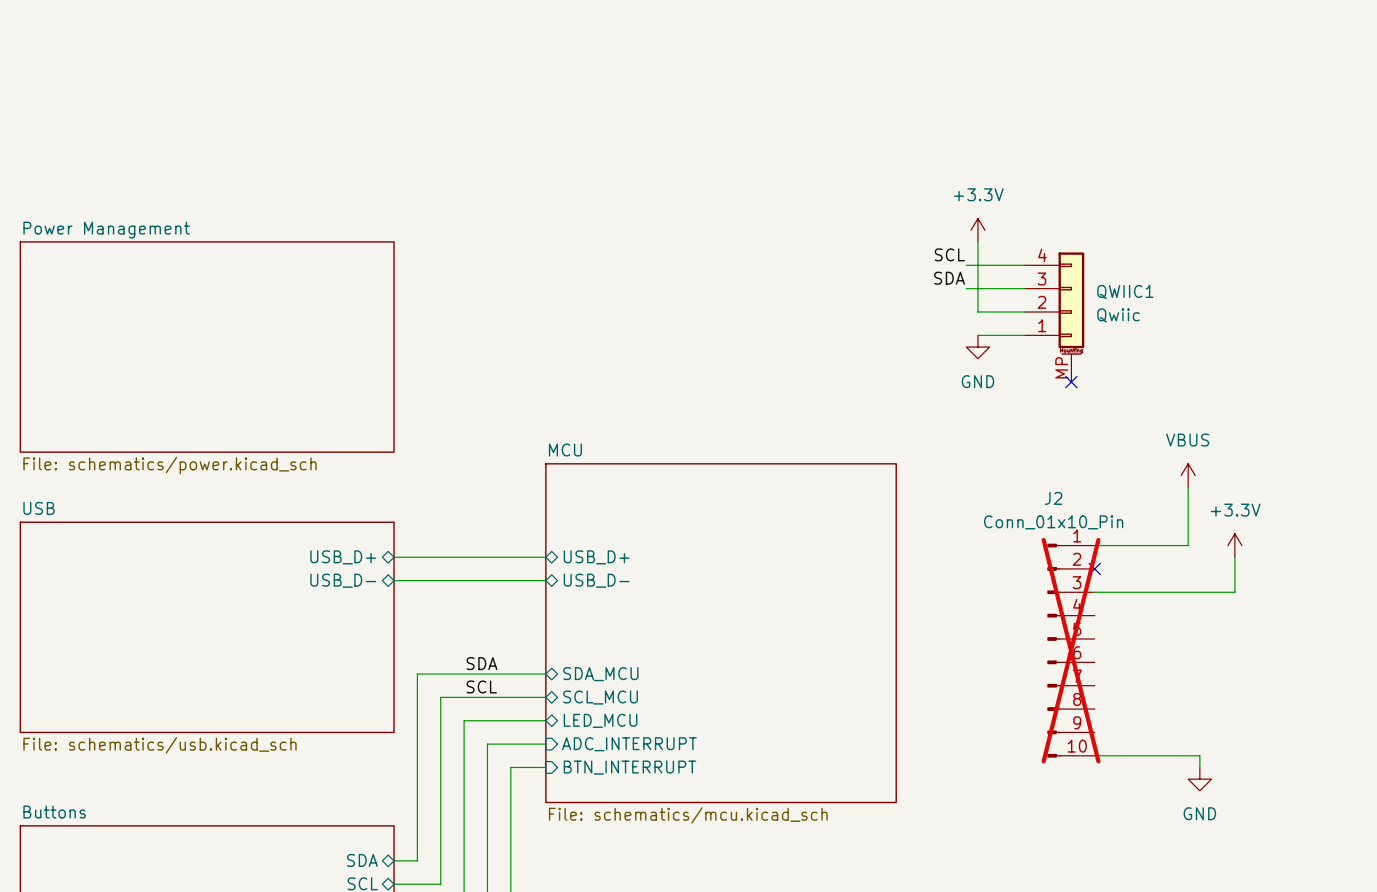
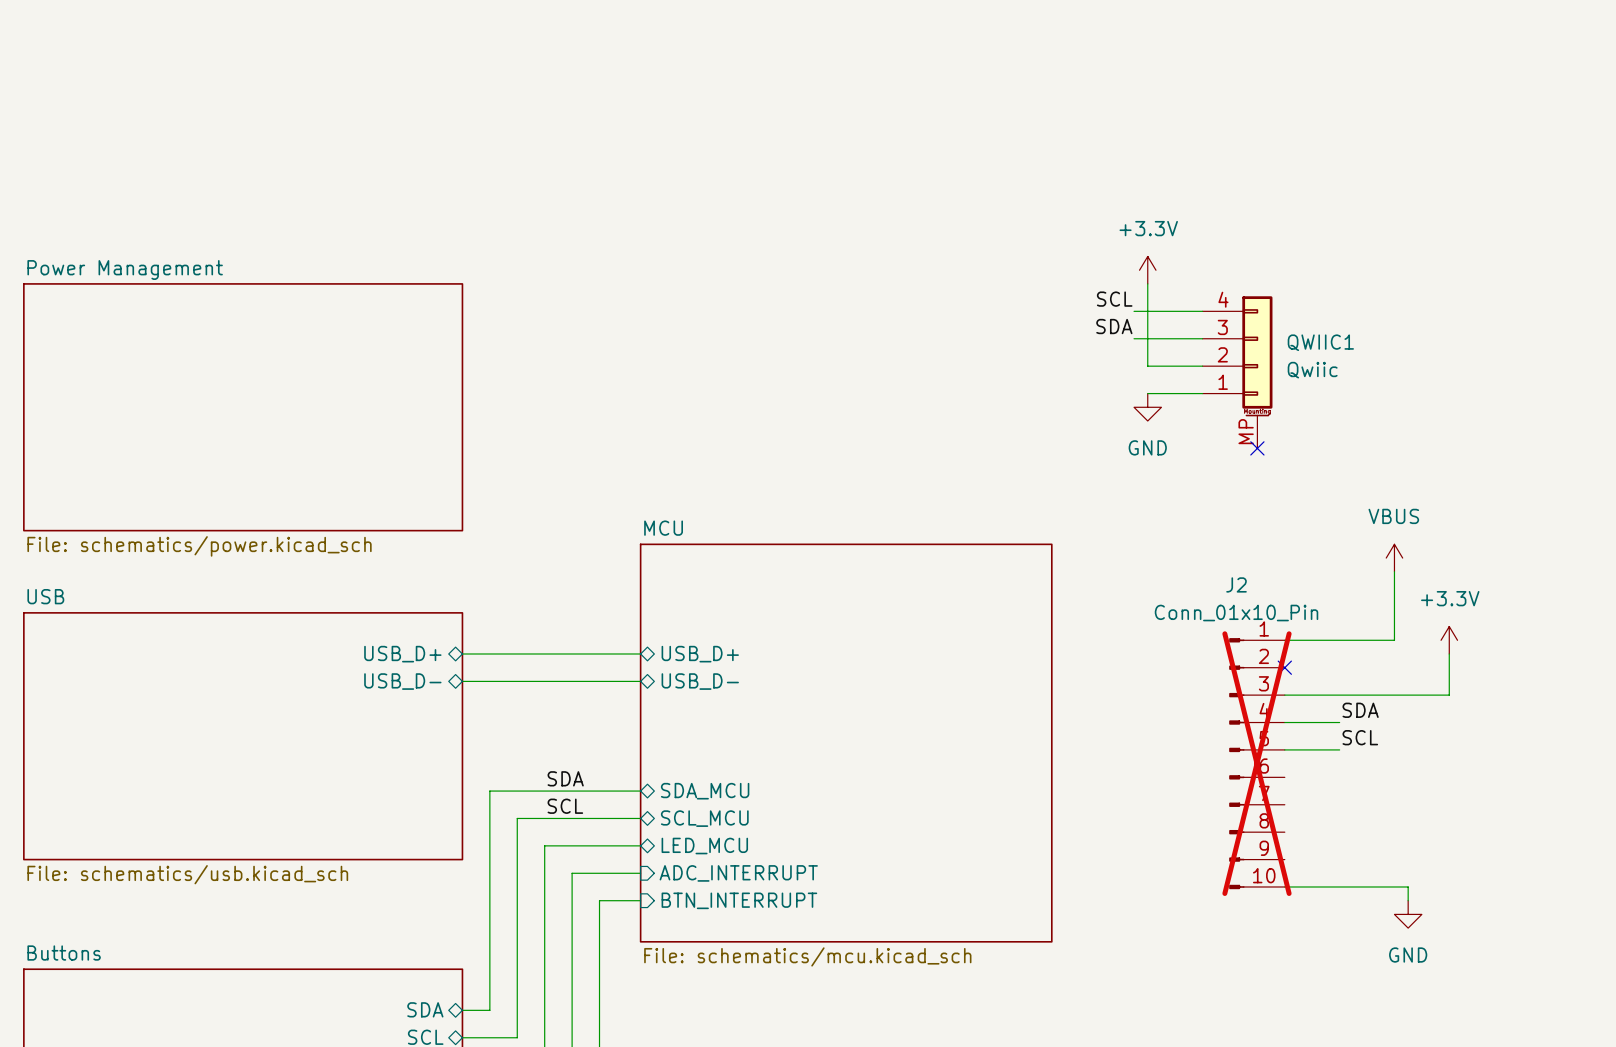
label: none -> SDA (1360, 710)
wire: none -> (1284, 722) (1339, 722)
label: none -> SCL (1360, 737)
wire: none -> (1284, 749) (1339, 749)

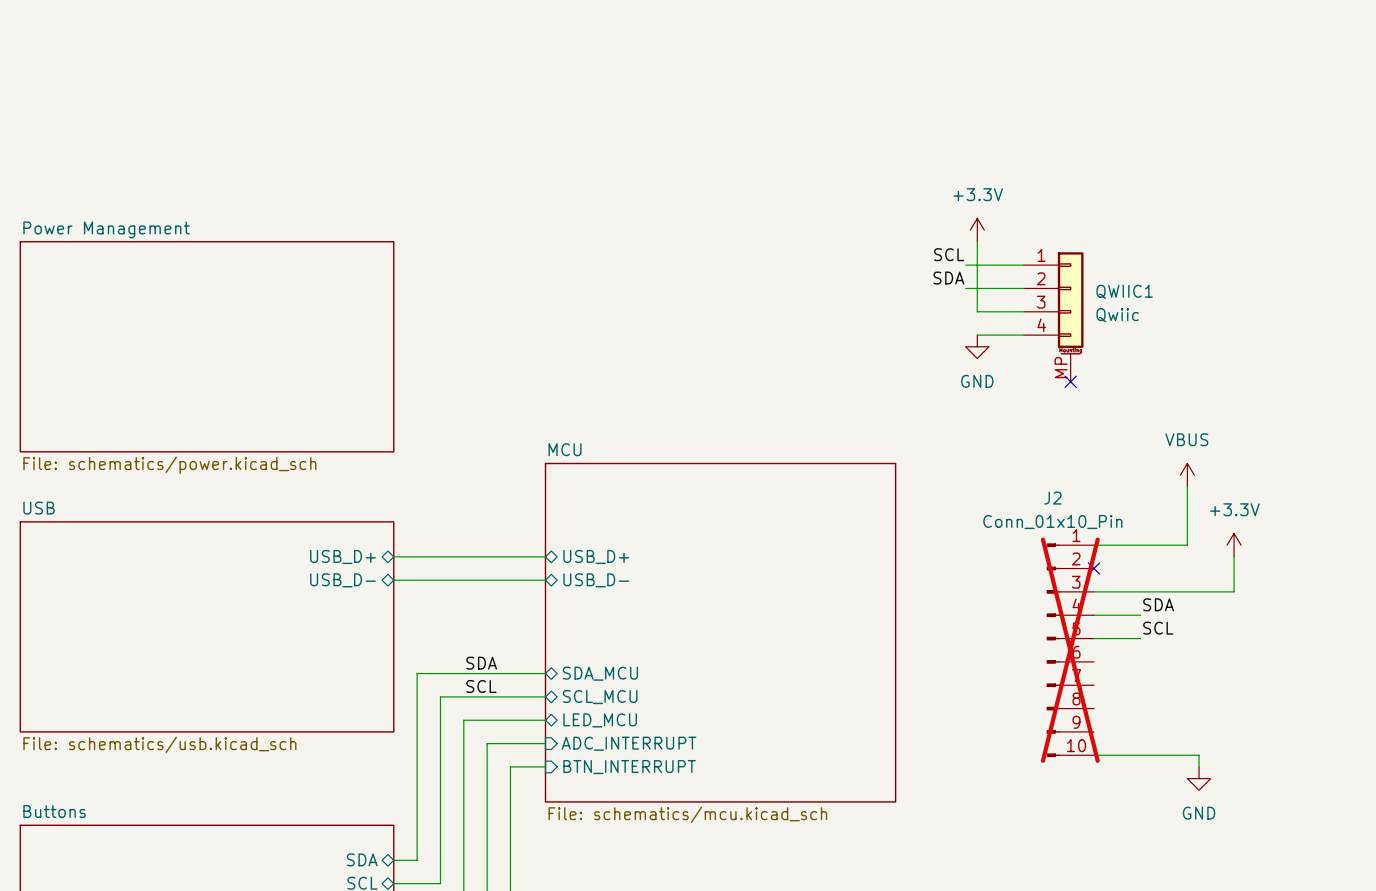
QWIIC1 pin number: 4 (1223, 299) -> 1 (1041, 255)
QWIIC1 pin number: 3 (1222, 327) -> 2 (1041, 278)
QWIIC1 pin number: 2 (1222, 354) -> 3 (1041, 302)
QWIIC1 pin number: 1 (1223, 382) -> 4 (1041, 325)

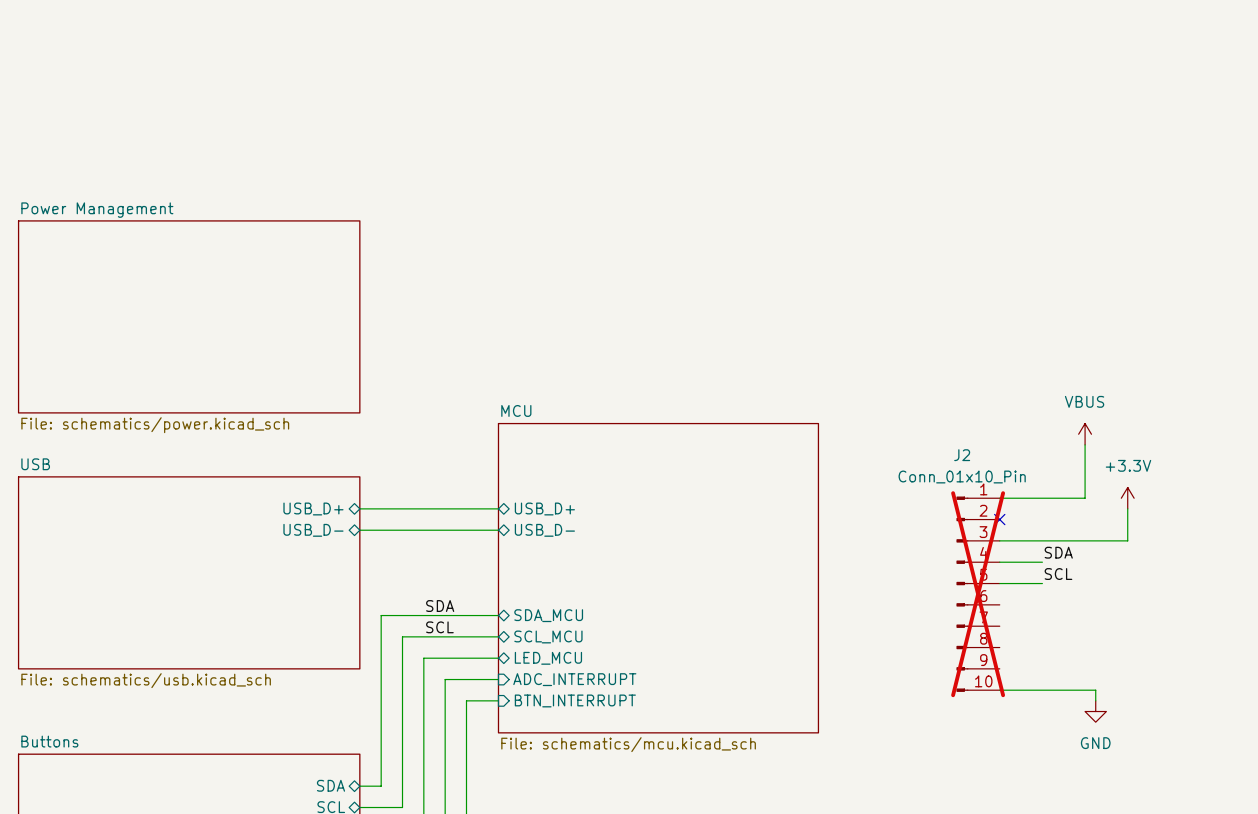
power symbol: +3.3V (977, 230) -> none
wire: (977, 241) (977, 311) (1023, 311) -> none
label: SCL (949, 254) -> none
wire: (965, 265) (1023, 265) -> none
label: SDA (948, 278) -> none
wire: (965, 288) (1023, 288) -> none
QWIIC1: Qwiic (1053, 317) -> none
wire: (977, 335) (1023, 335) -> none
power symbol: GND (977, 346) -> none
no-connect mark: (1070, 381) -> none

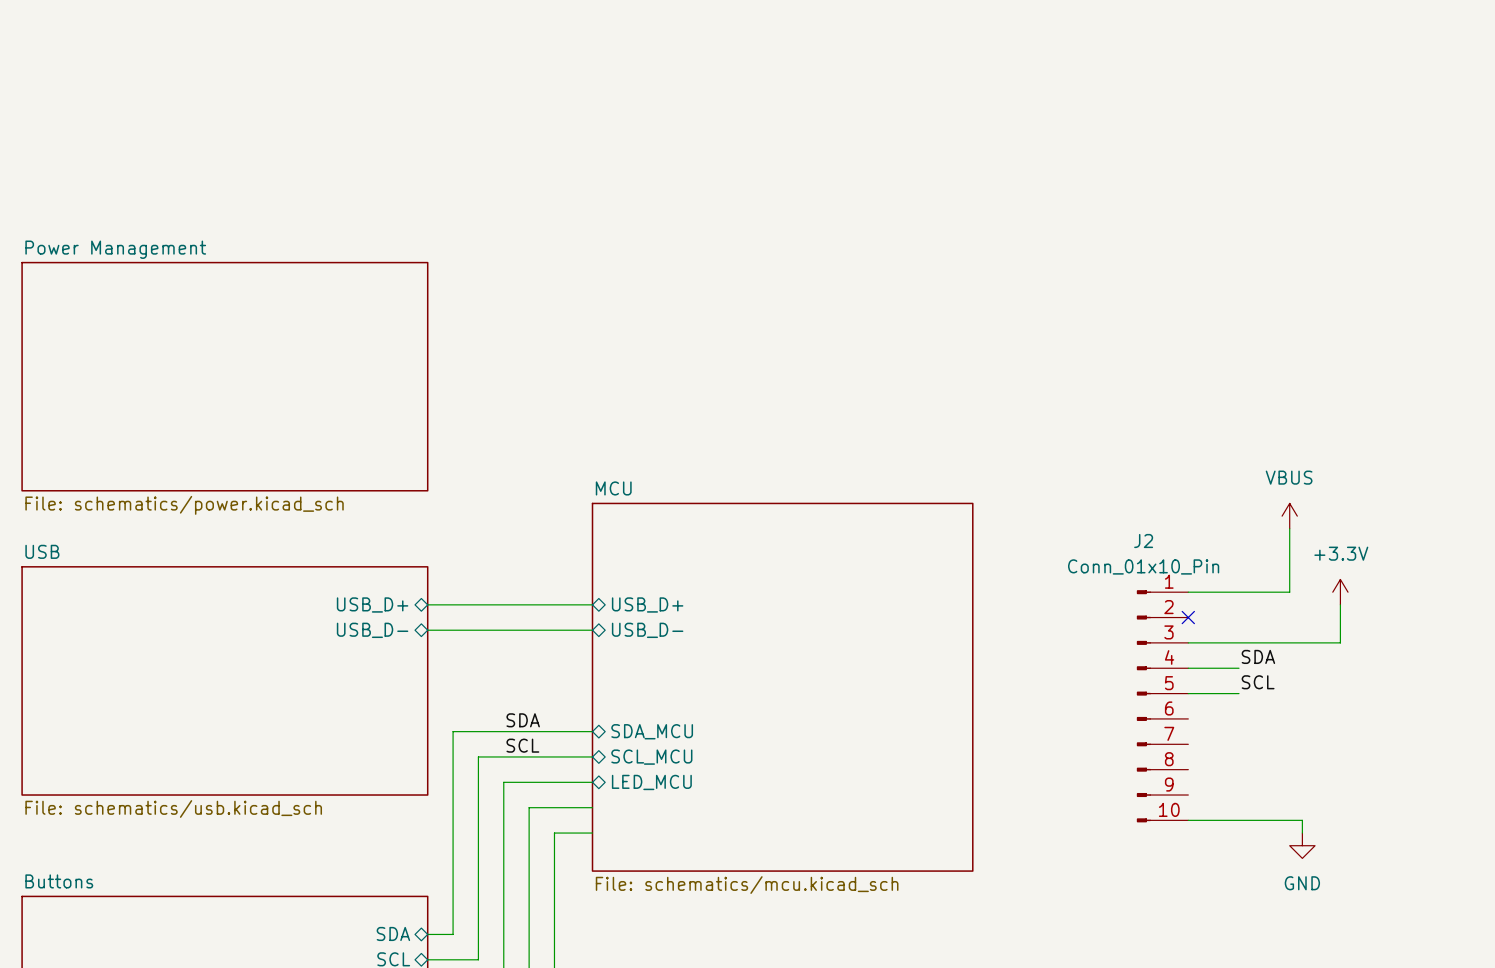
J2 do-not-place cross: (978, 594) -> none
sheet pin: ADC_INTERRUPT (574, 679) -> none
sheet pin: BTN_INTERRUPT (575, 700) -> none

